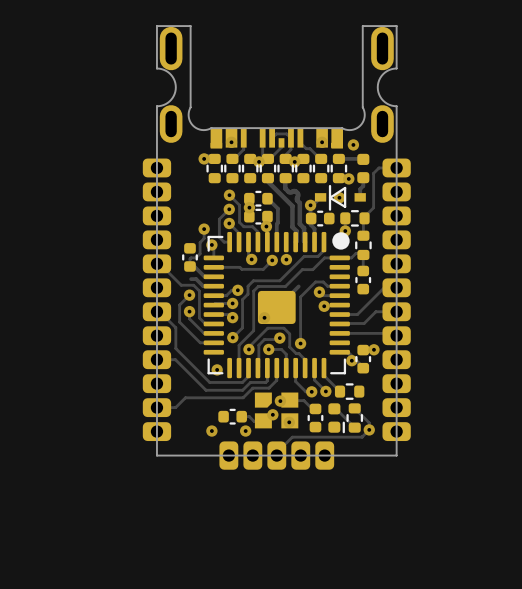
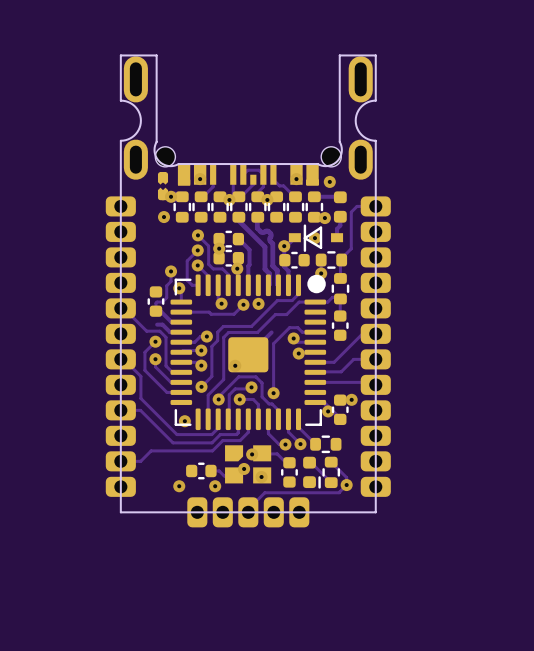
part: none -> (165, 156)
part: none -> (331, 156)
part: none -> (163, 186)
via: none -> (164, 217)

